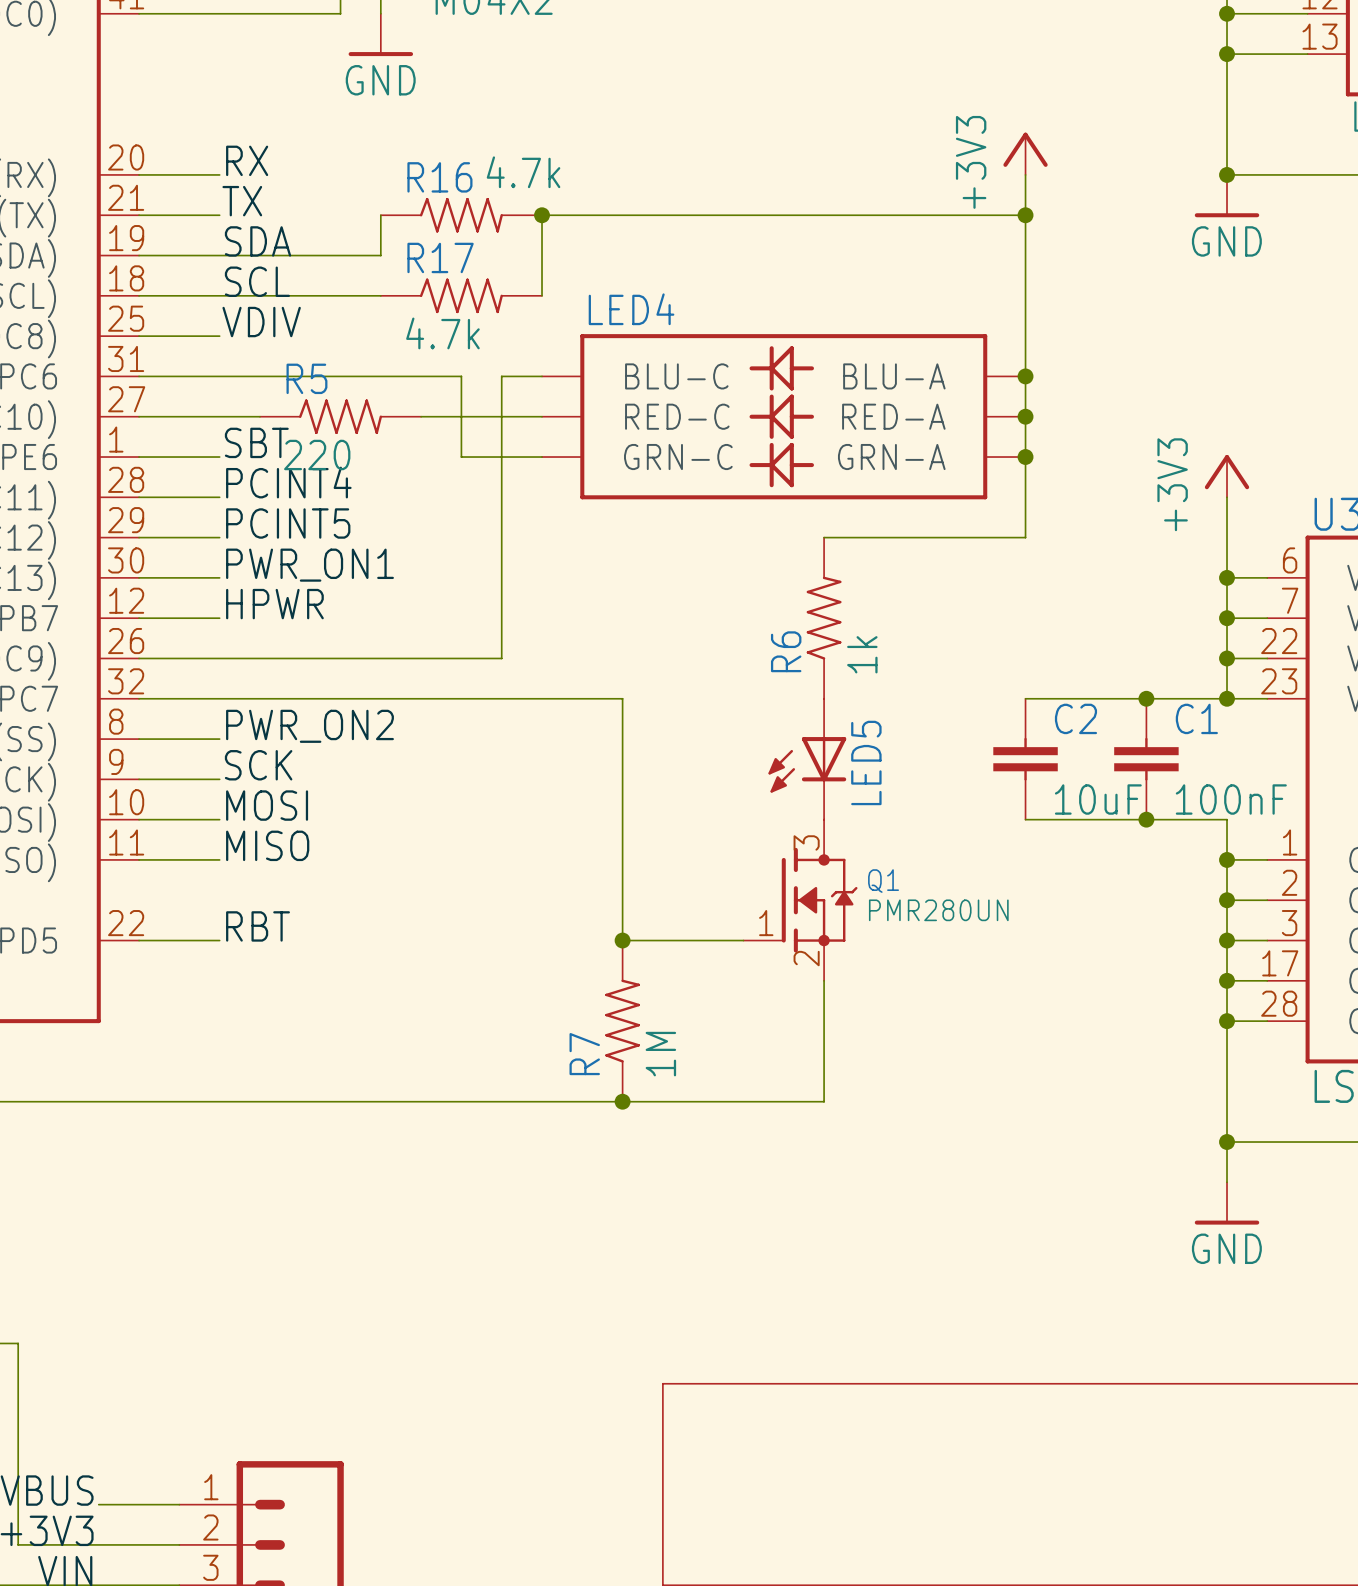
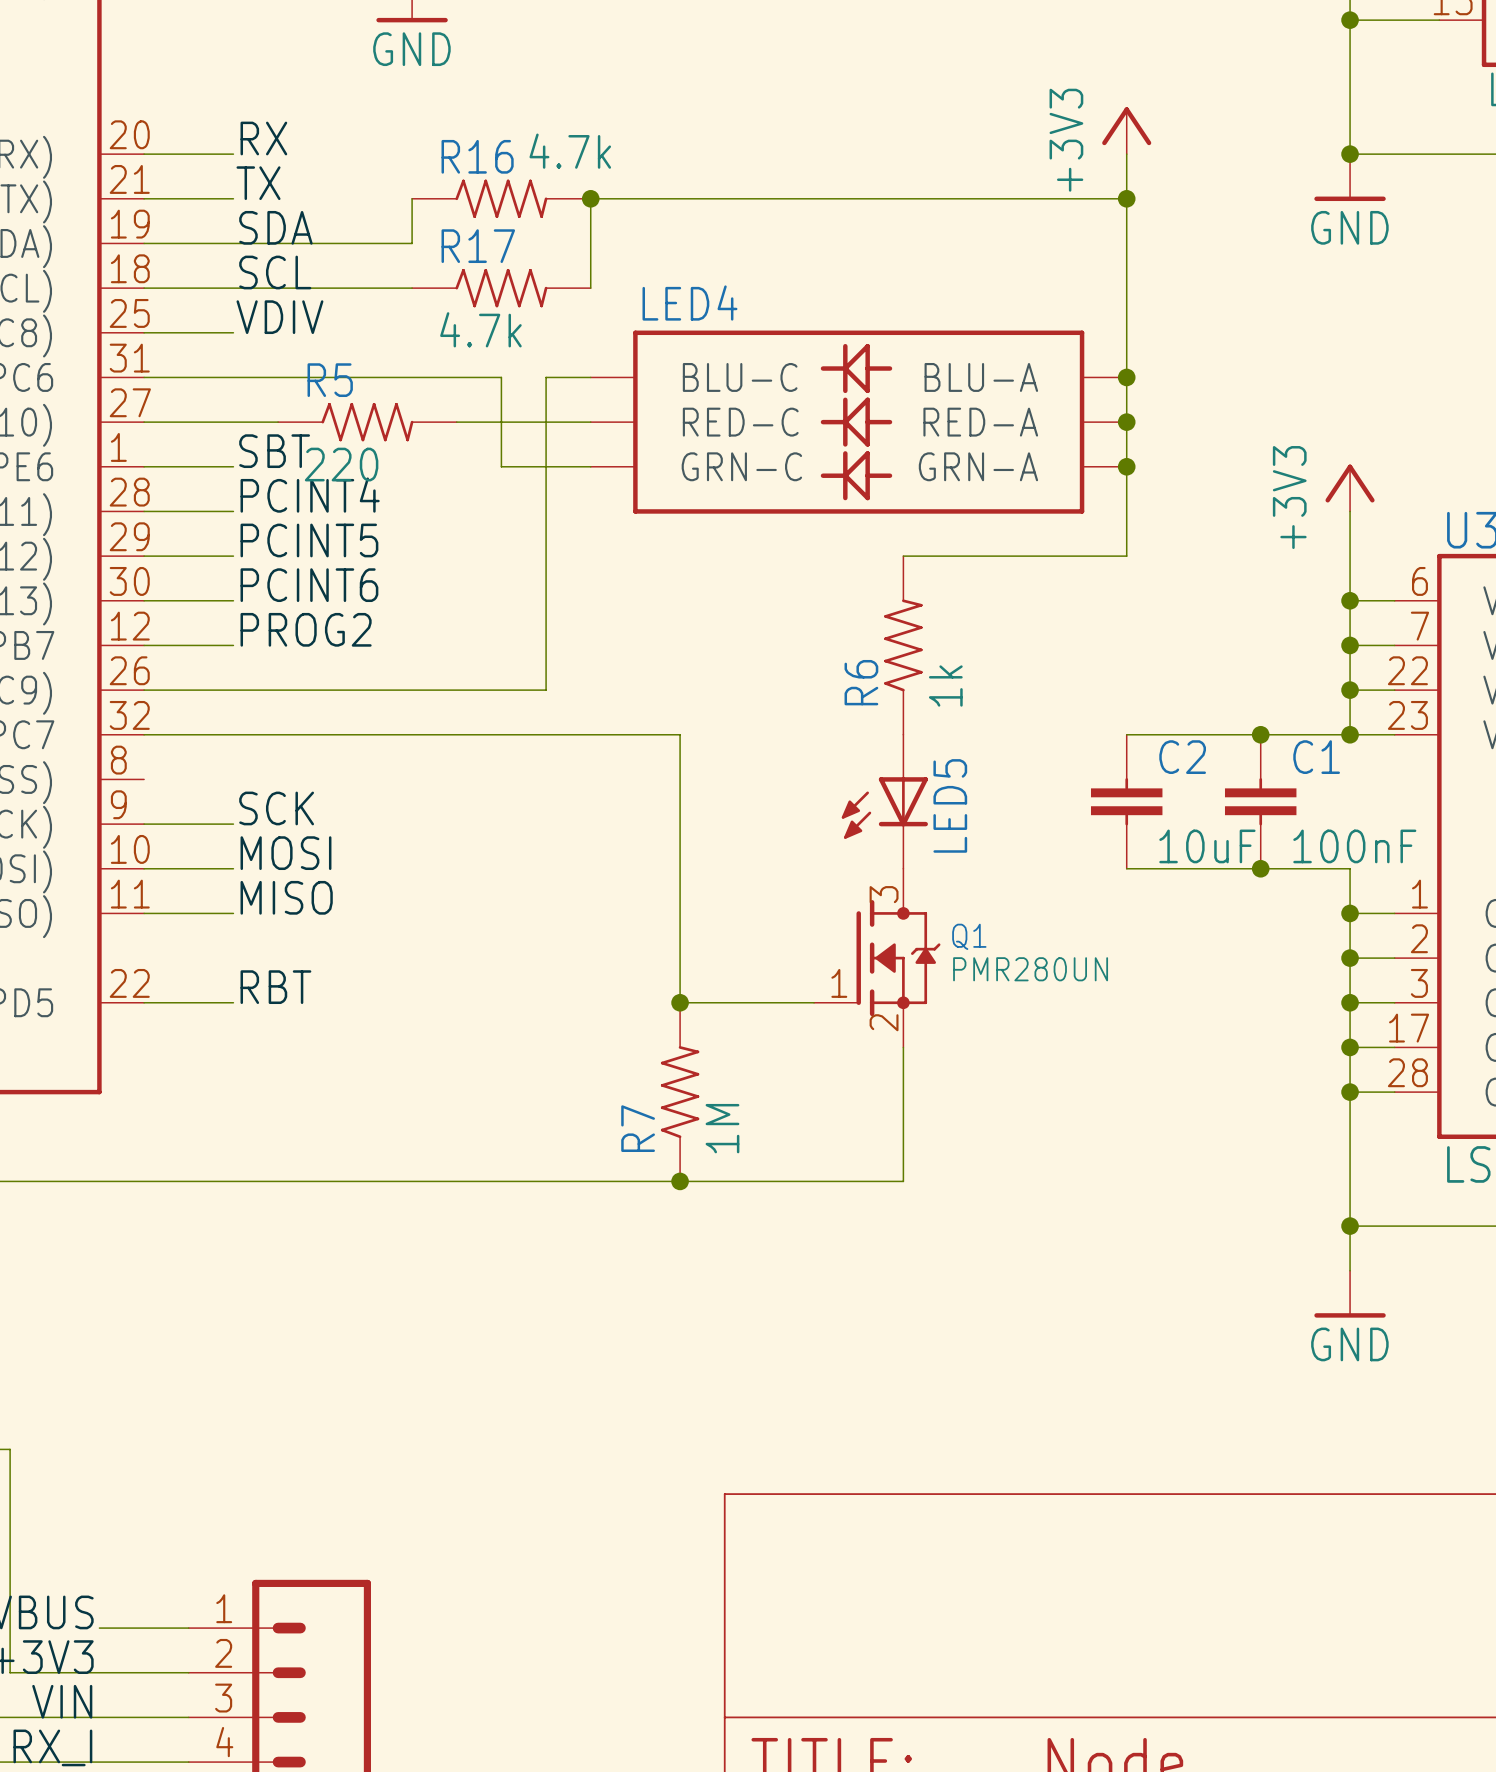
label: PWR_ON1 (309, 565) -> PCINT6 (309, 585)
label: HPWR (274, 604) -> PROG2 (306, 629)
label: PWR_ON2 (309, 726) -> none
wire: (139, 739) (219, 739) -> none

